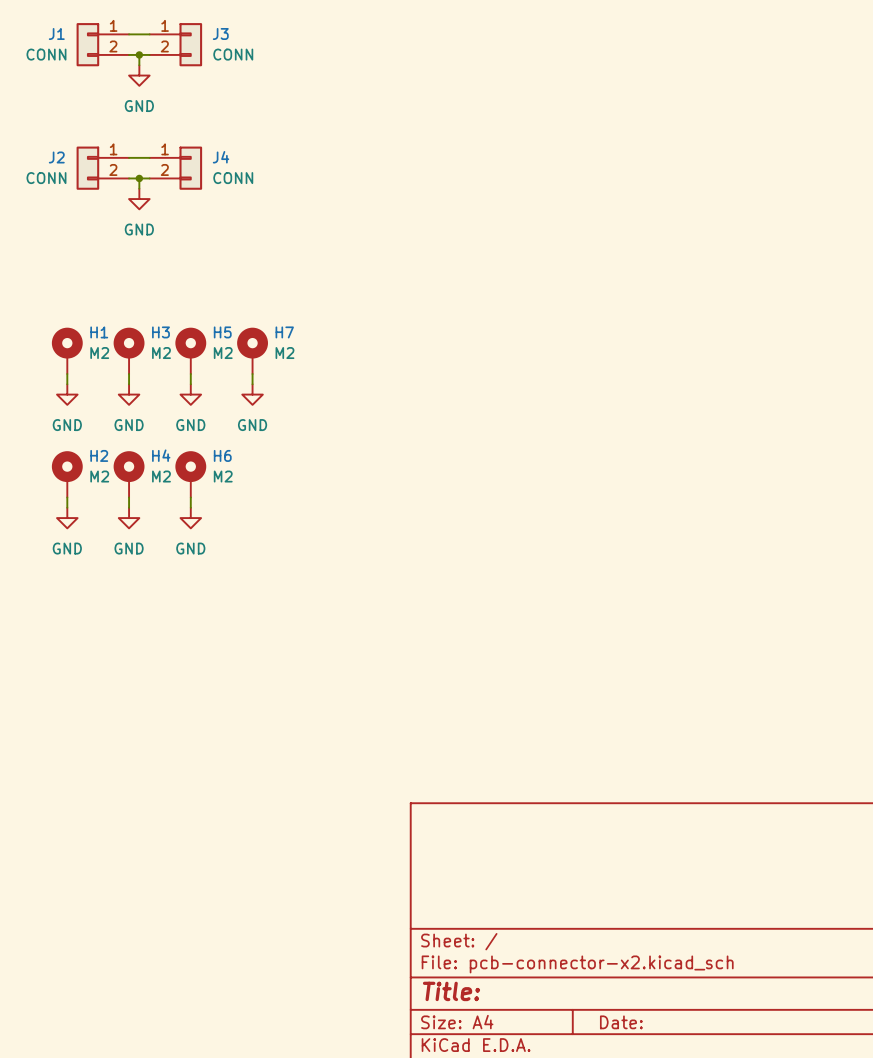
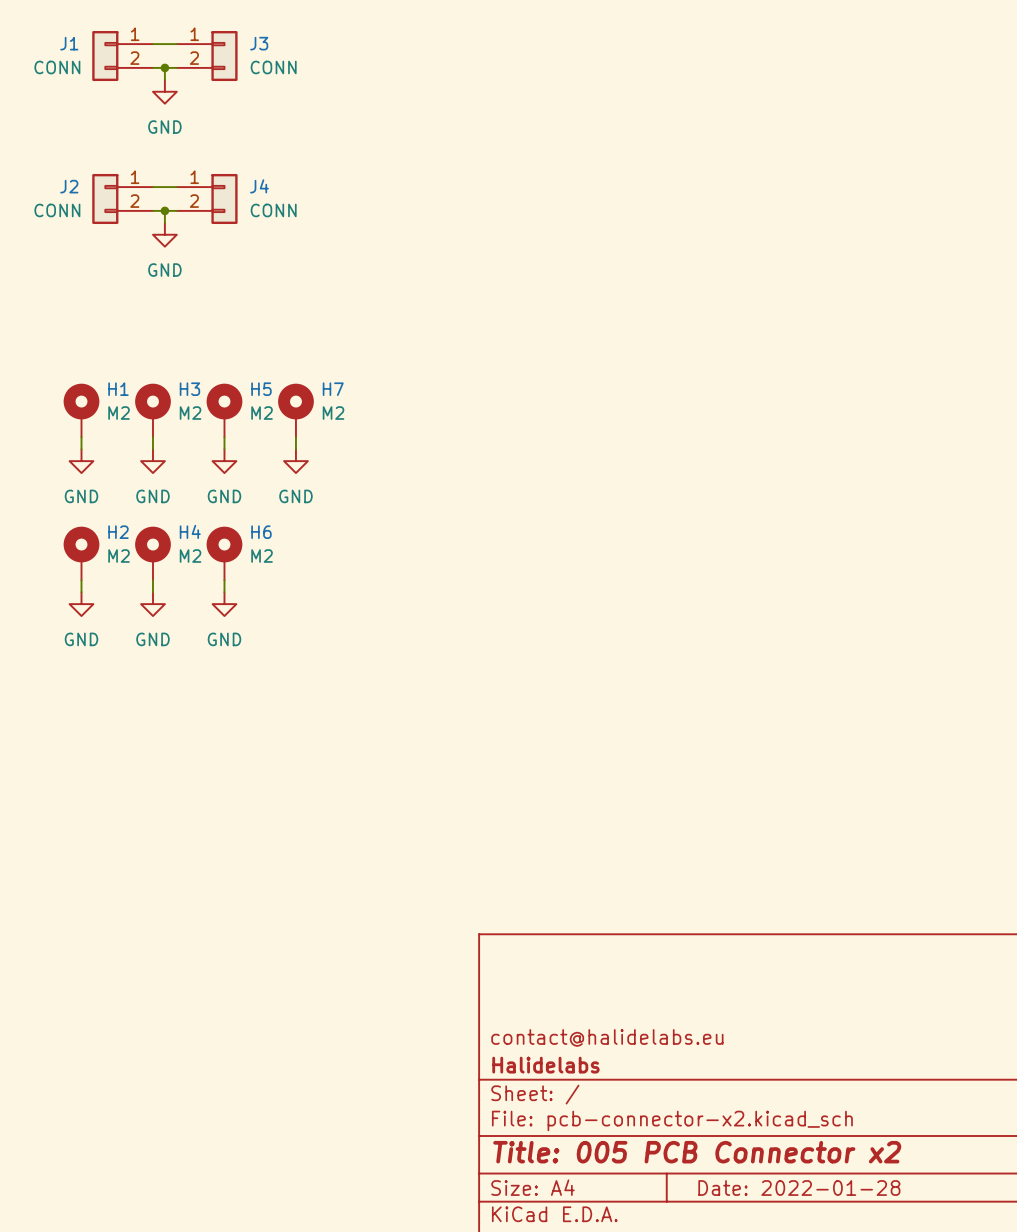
title block: none -> contact@halidelabs.eu (607, 1037)
title block: none -> Halidelabs (545, 1065)
title block: Title: (451, 991) -> Title: 005 PCB Connector x2 (697, 1152)
title block: Date: (621, 1022) -> Date: 2022-01-28 (799, 1188)

